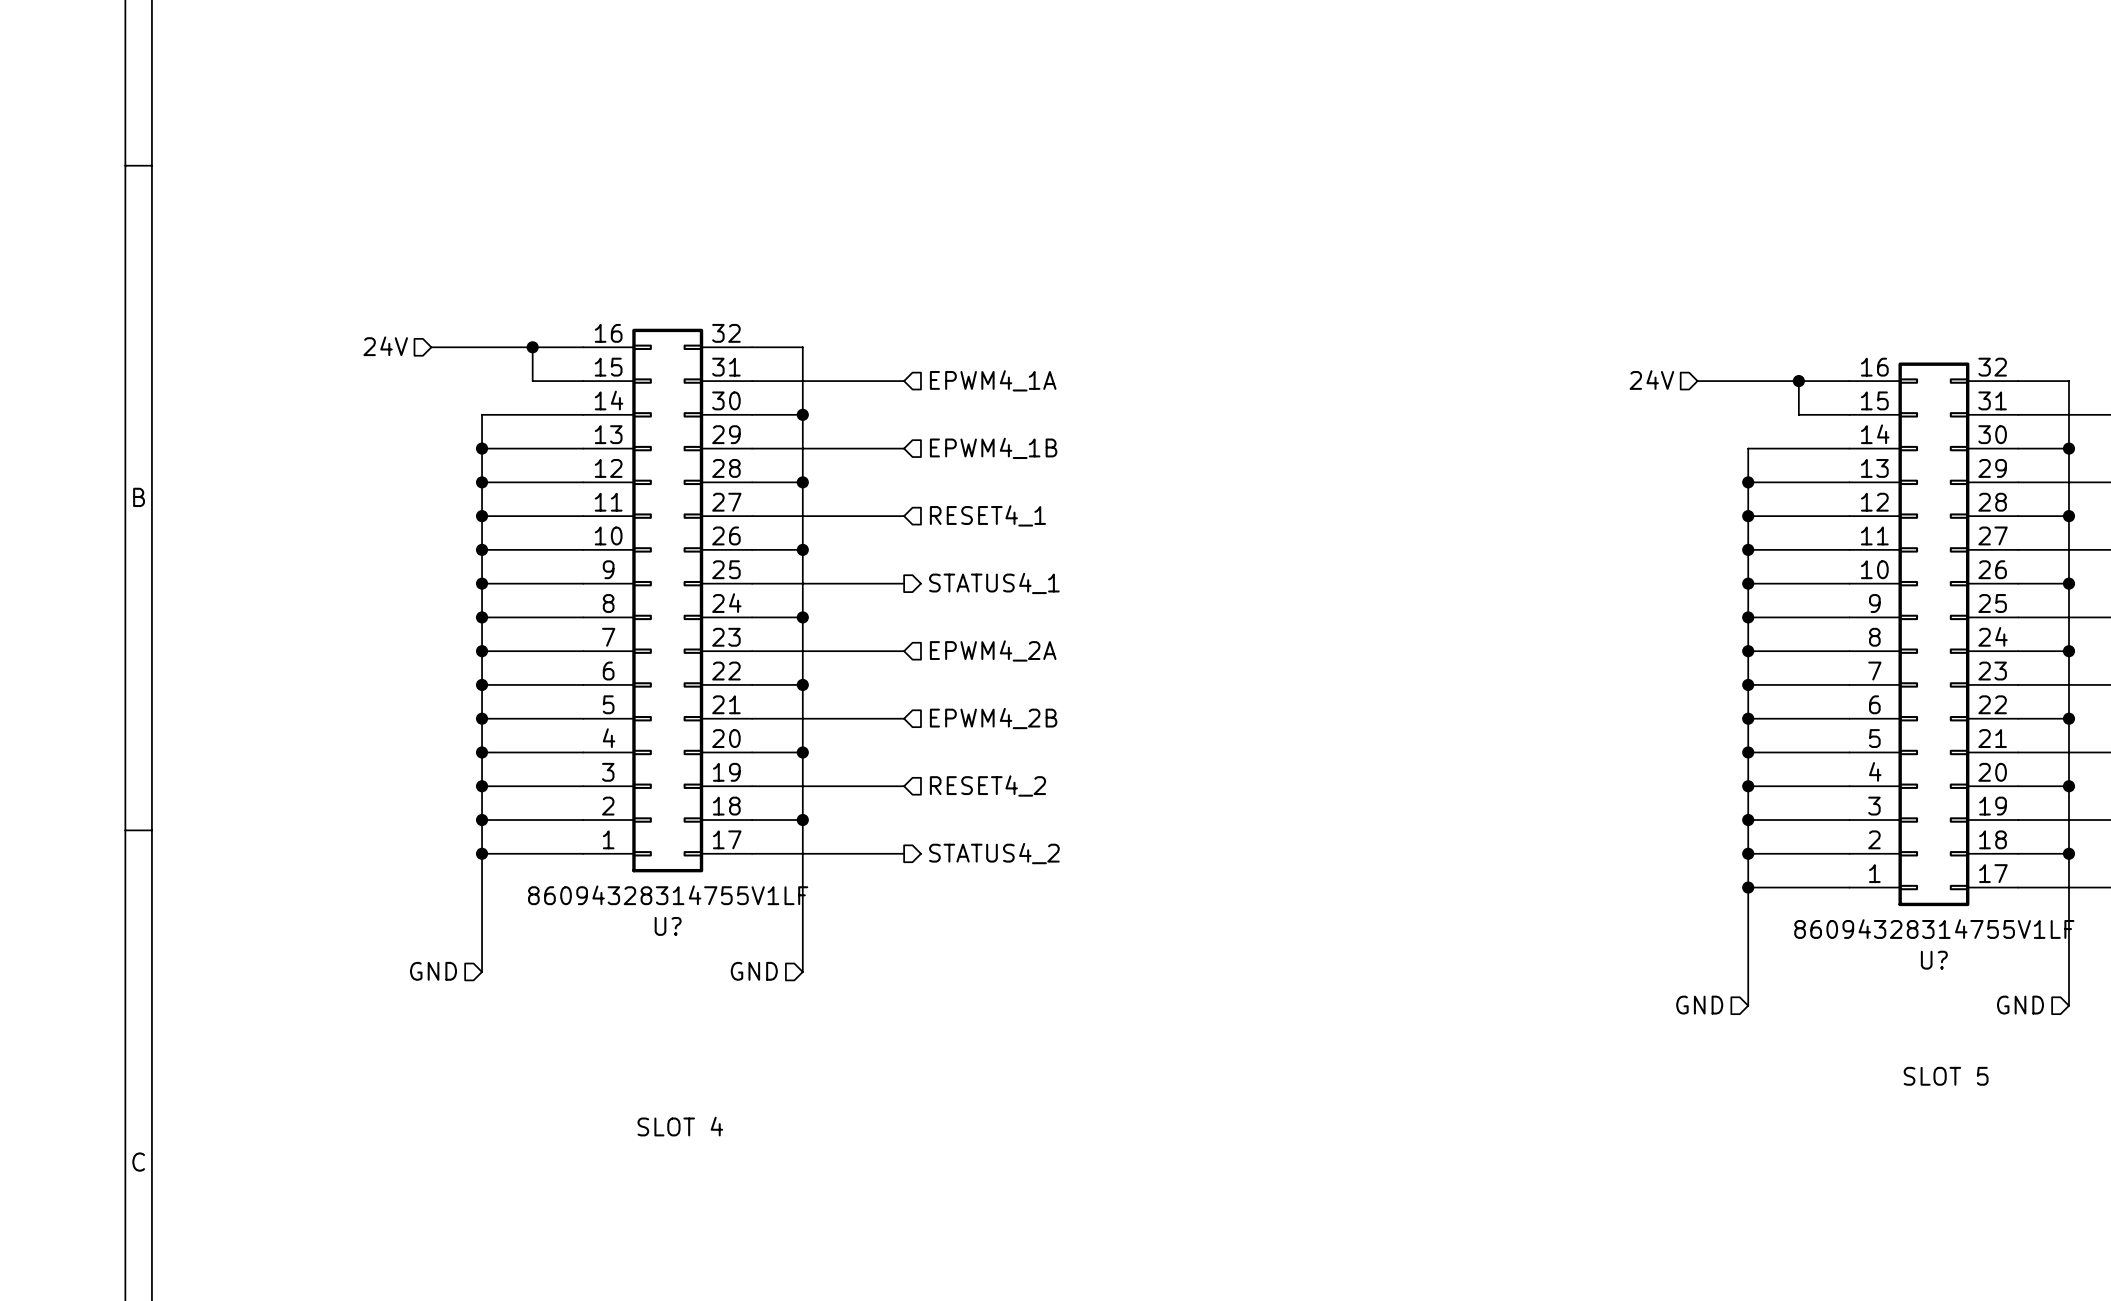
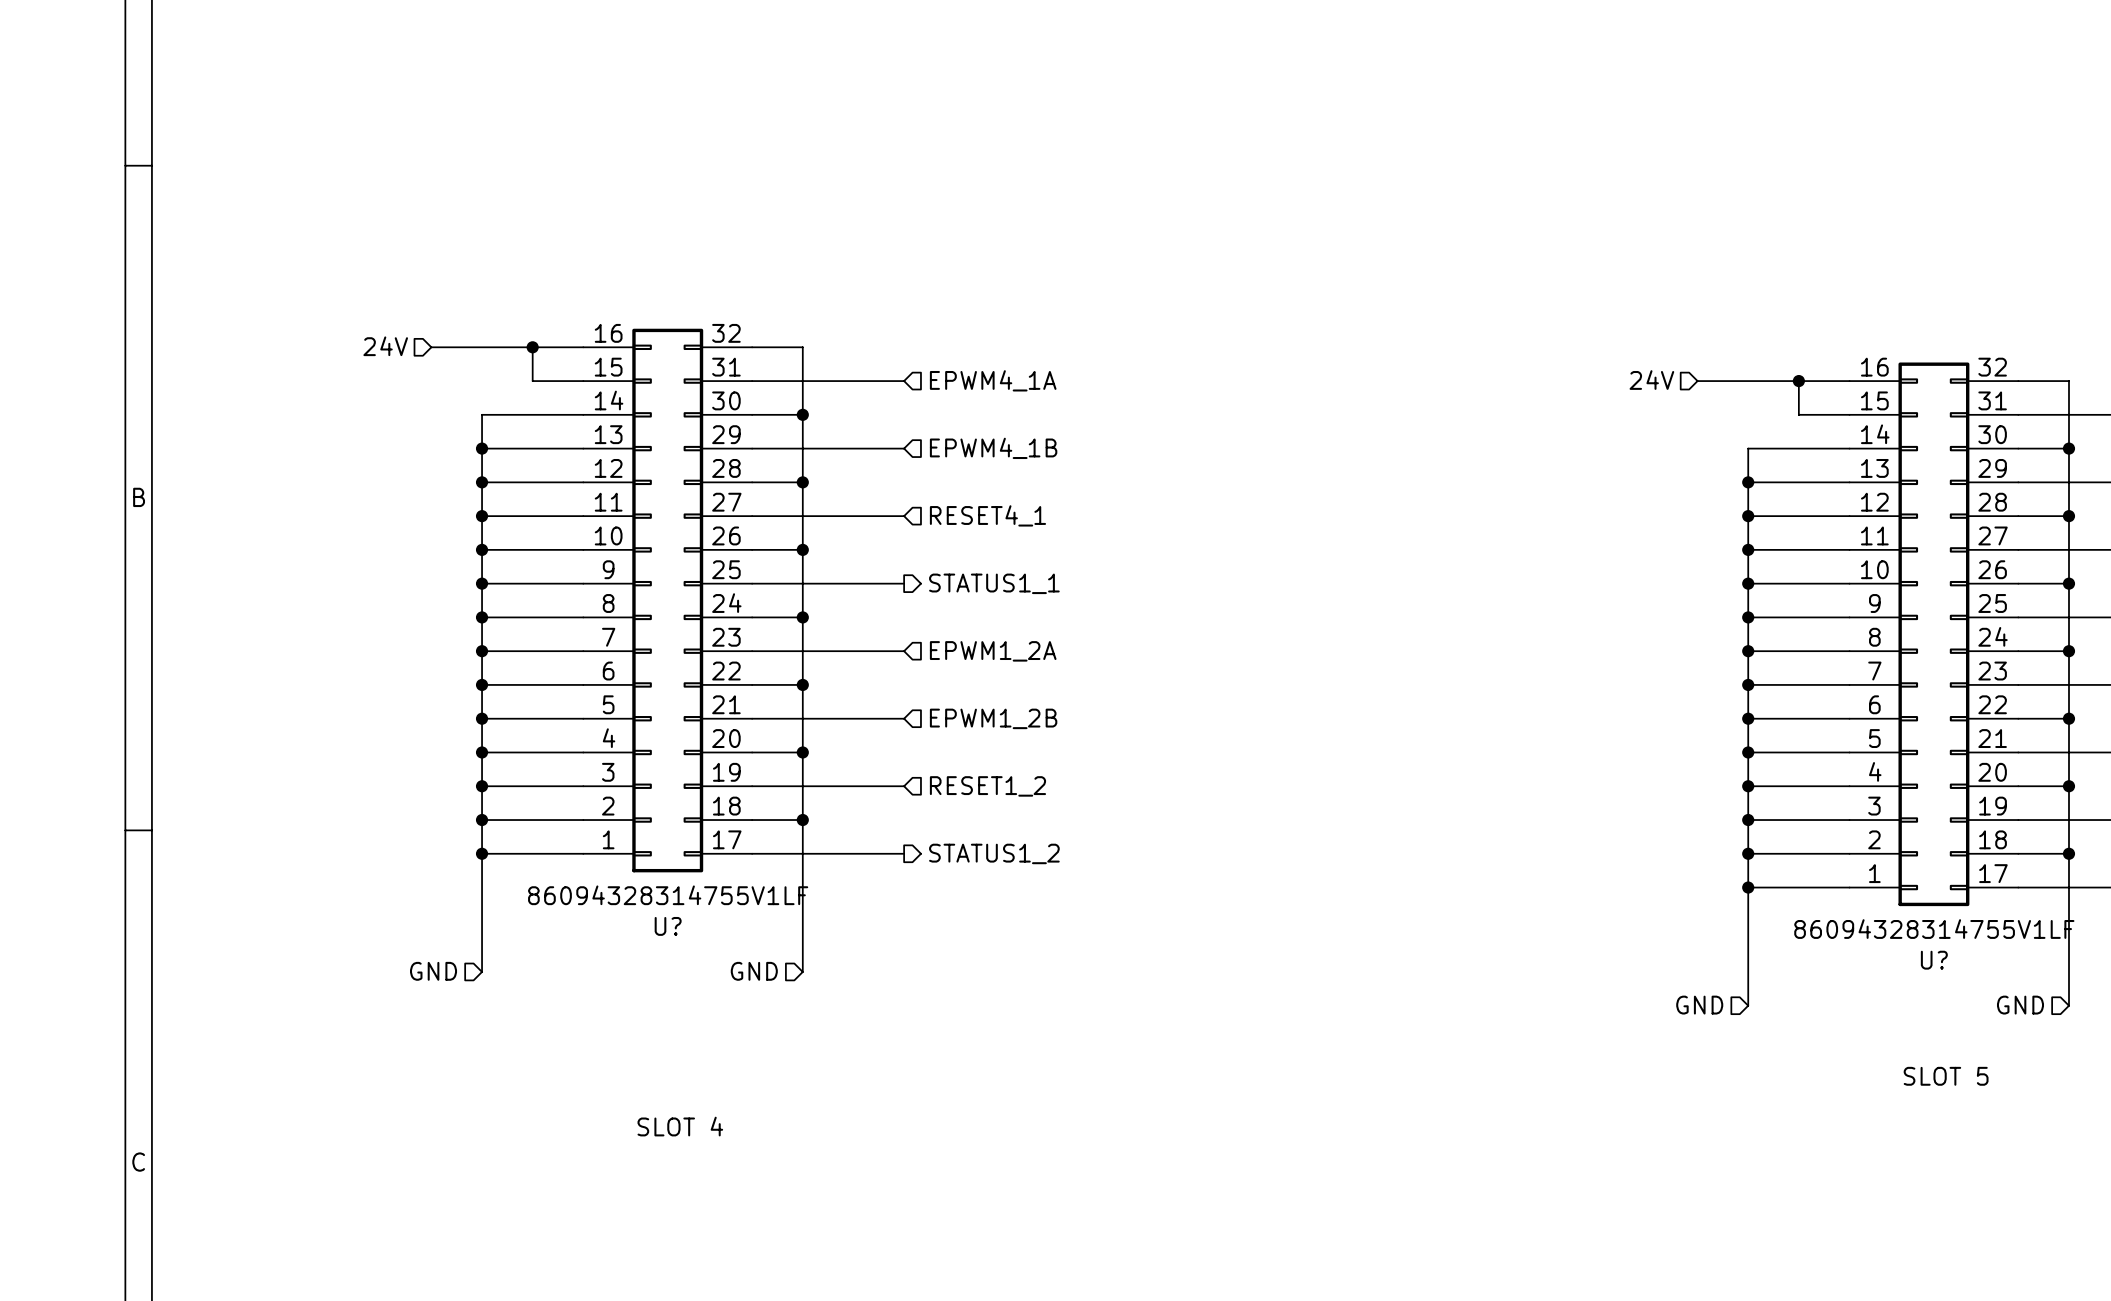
hierarchical label: STATUS4_1 (994, 583) -> STATUS1_1 (994, 583)
hierarchical label: EPWM4_2A (993, 650) -> EPWM1_2A (993, 651)
hierarchical label: EPWM4_2B (993, 718) -> EPWM1_2B (993, 718)
hierarchical label: RESET4_2 (987, 786) -> RESET1_2 (987, 786)
hierarchical label: STATUS4_2 (994, 853) -> STATUS1_2 (994, 853)

